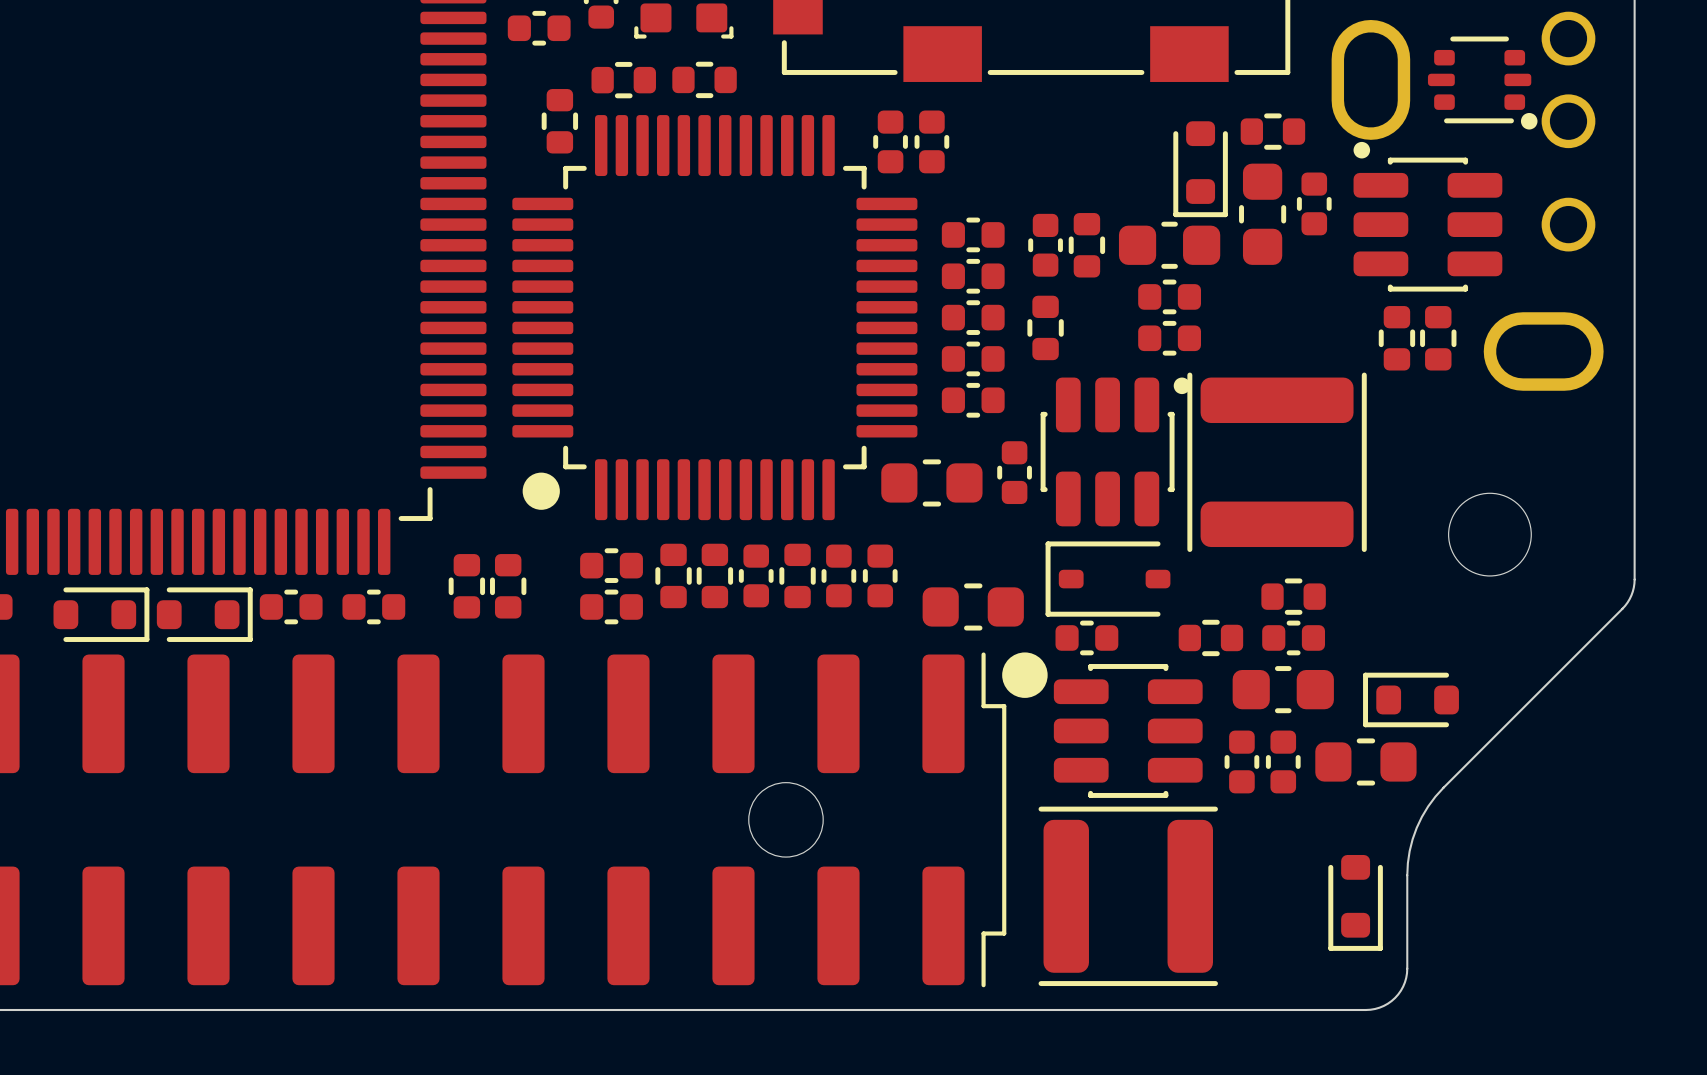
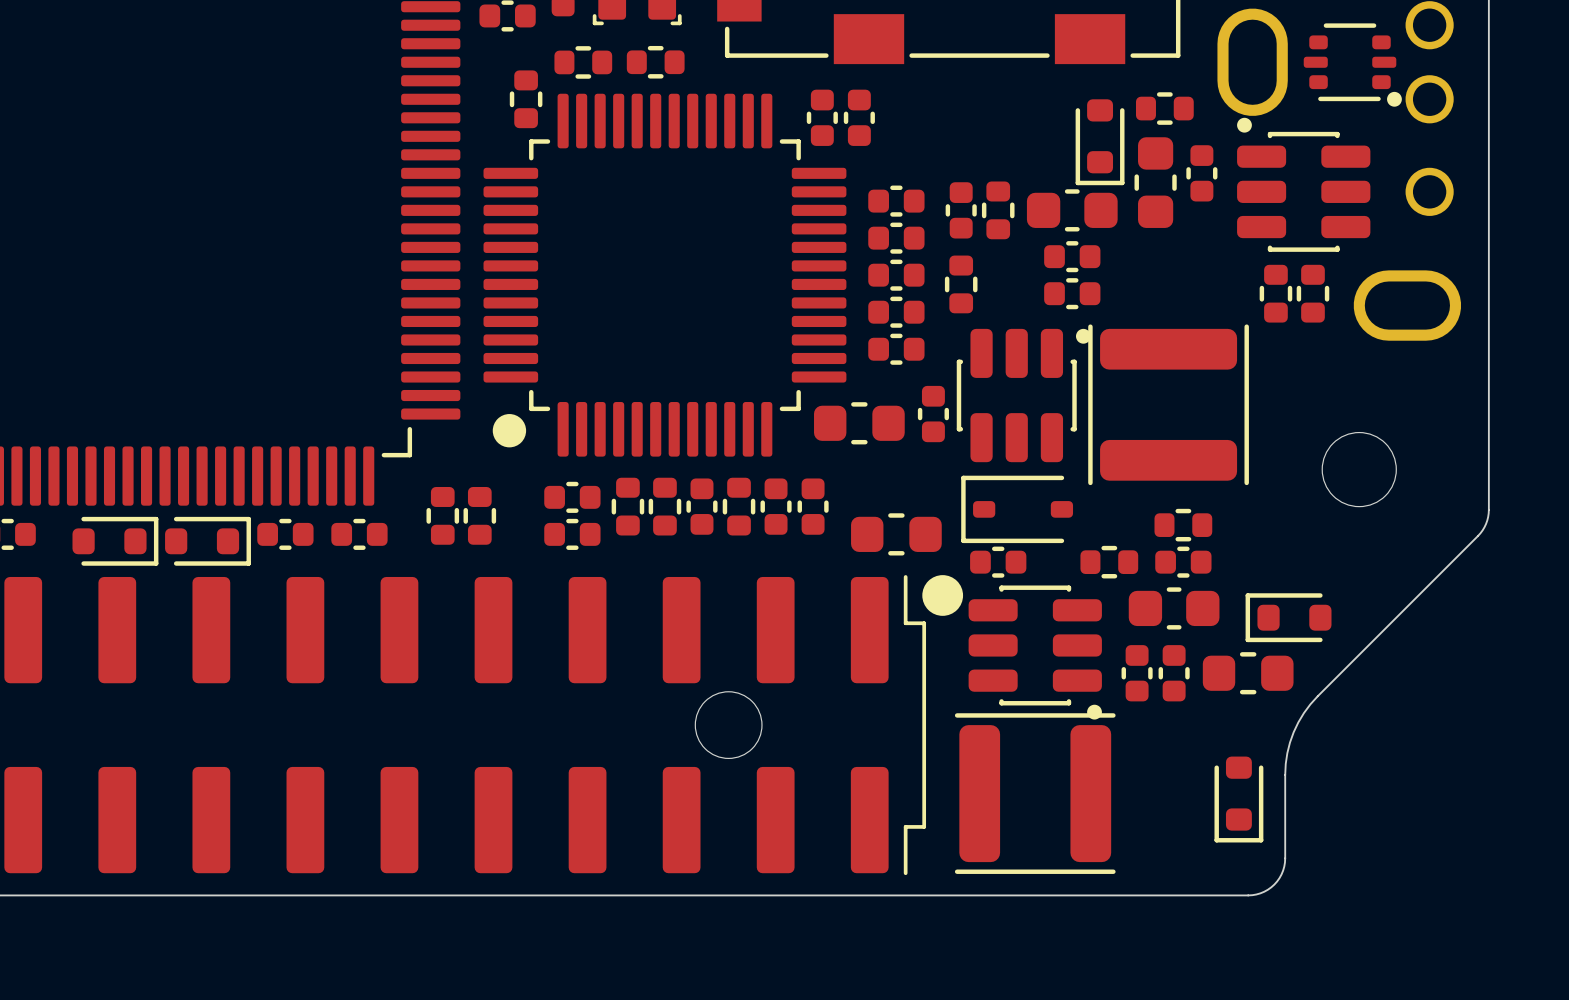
part footprint: [1053, 664, 1203, 798] -> [968, 585, 1102, 720]

